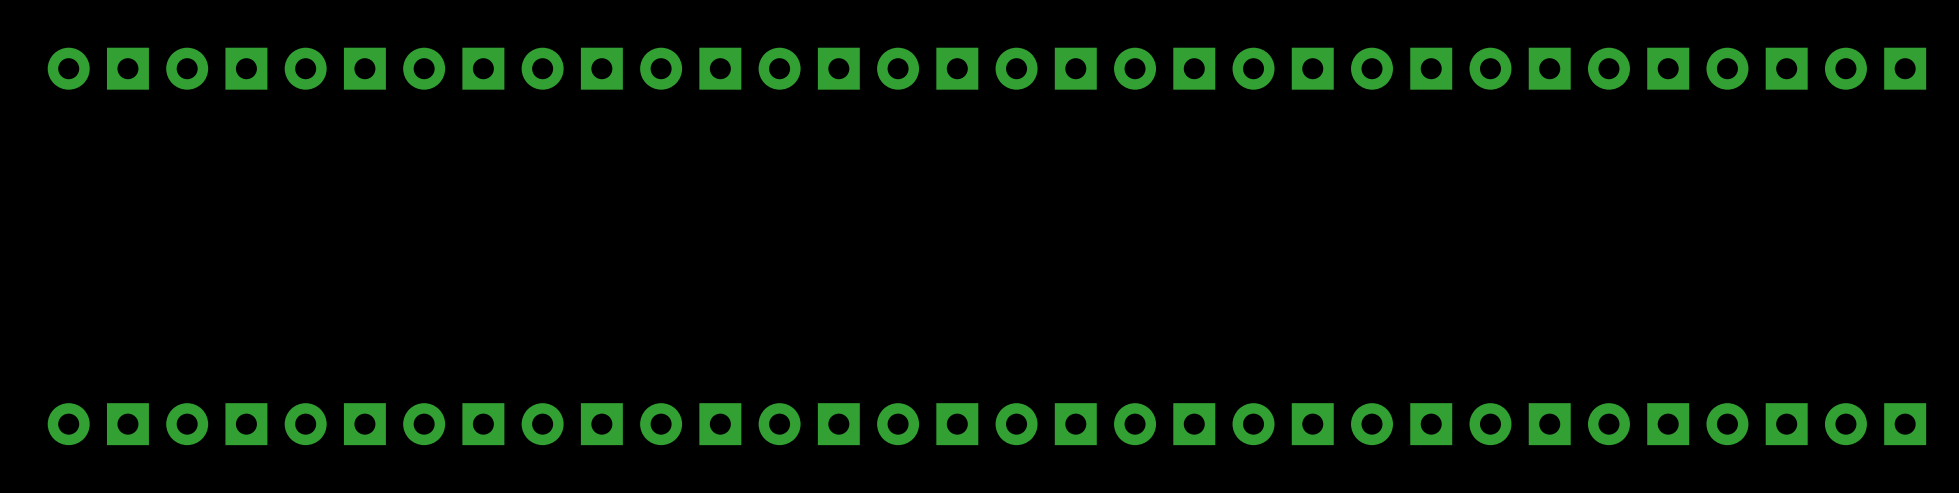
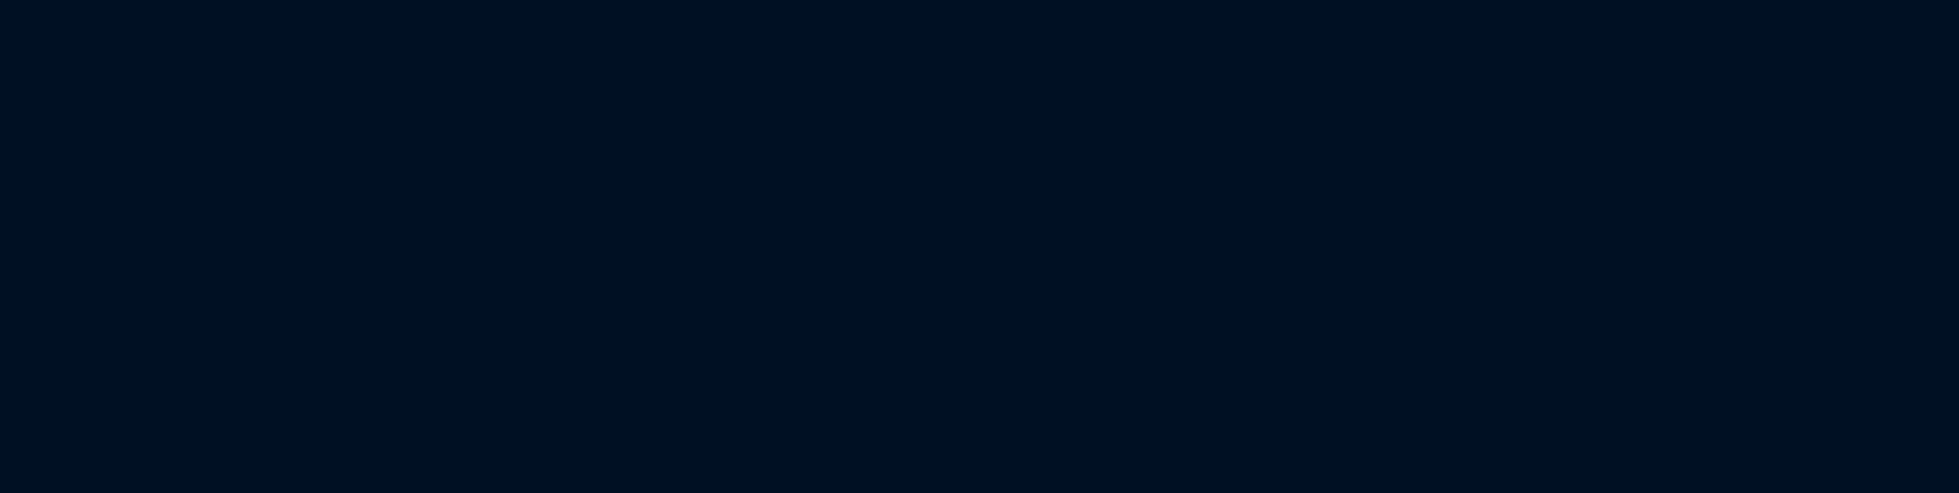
part: (98, 68) -> none
part: (216, 68) -> none
part: (335, 68) -> none
part: (453, 68) -> none
part: (572, 68) -> none
part: (690, 68) -> none
part: (809, 68) -> none
part: (927, 68) -> none
part: (1046, 68) -> none
part: (1164, 68) -> none
part: (1283, 68) -> none
part: (1401, 68) -> none
part: (1520, 68) -> none
part: (1638, 68) -> none
part: (1757, 68) -> none
part: (1875, 68) -> none
part: (98, 424) -> none
part: (216, 424) -> none
part: (335, 424) -> none
part: (453, 424) -> none
part: (572, 424) -> none
part: (690, 424) -> none
part: (809, 424) -> none
part: (927, 424) -> none
part: (1046, 424) -> none
part: (1164, 424) -> none
part: (1283, 424) -> none
part: (1401, 424) -> none
part: (1520, 424) -> none
part: (1638, 424) -> none
part: (1757, 424) -> none
part: (1875, 424) -> none

